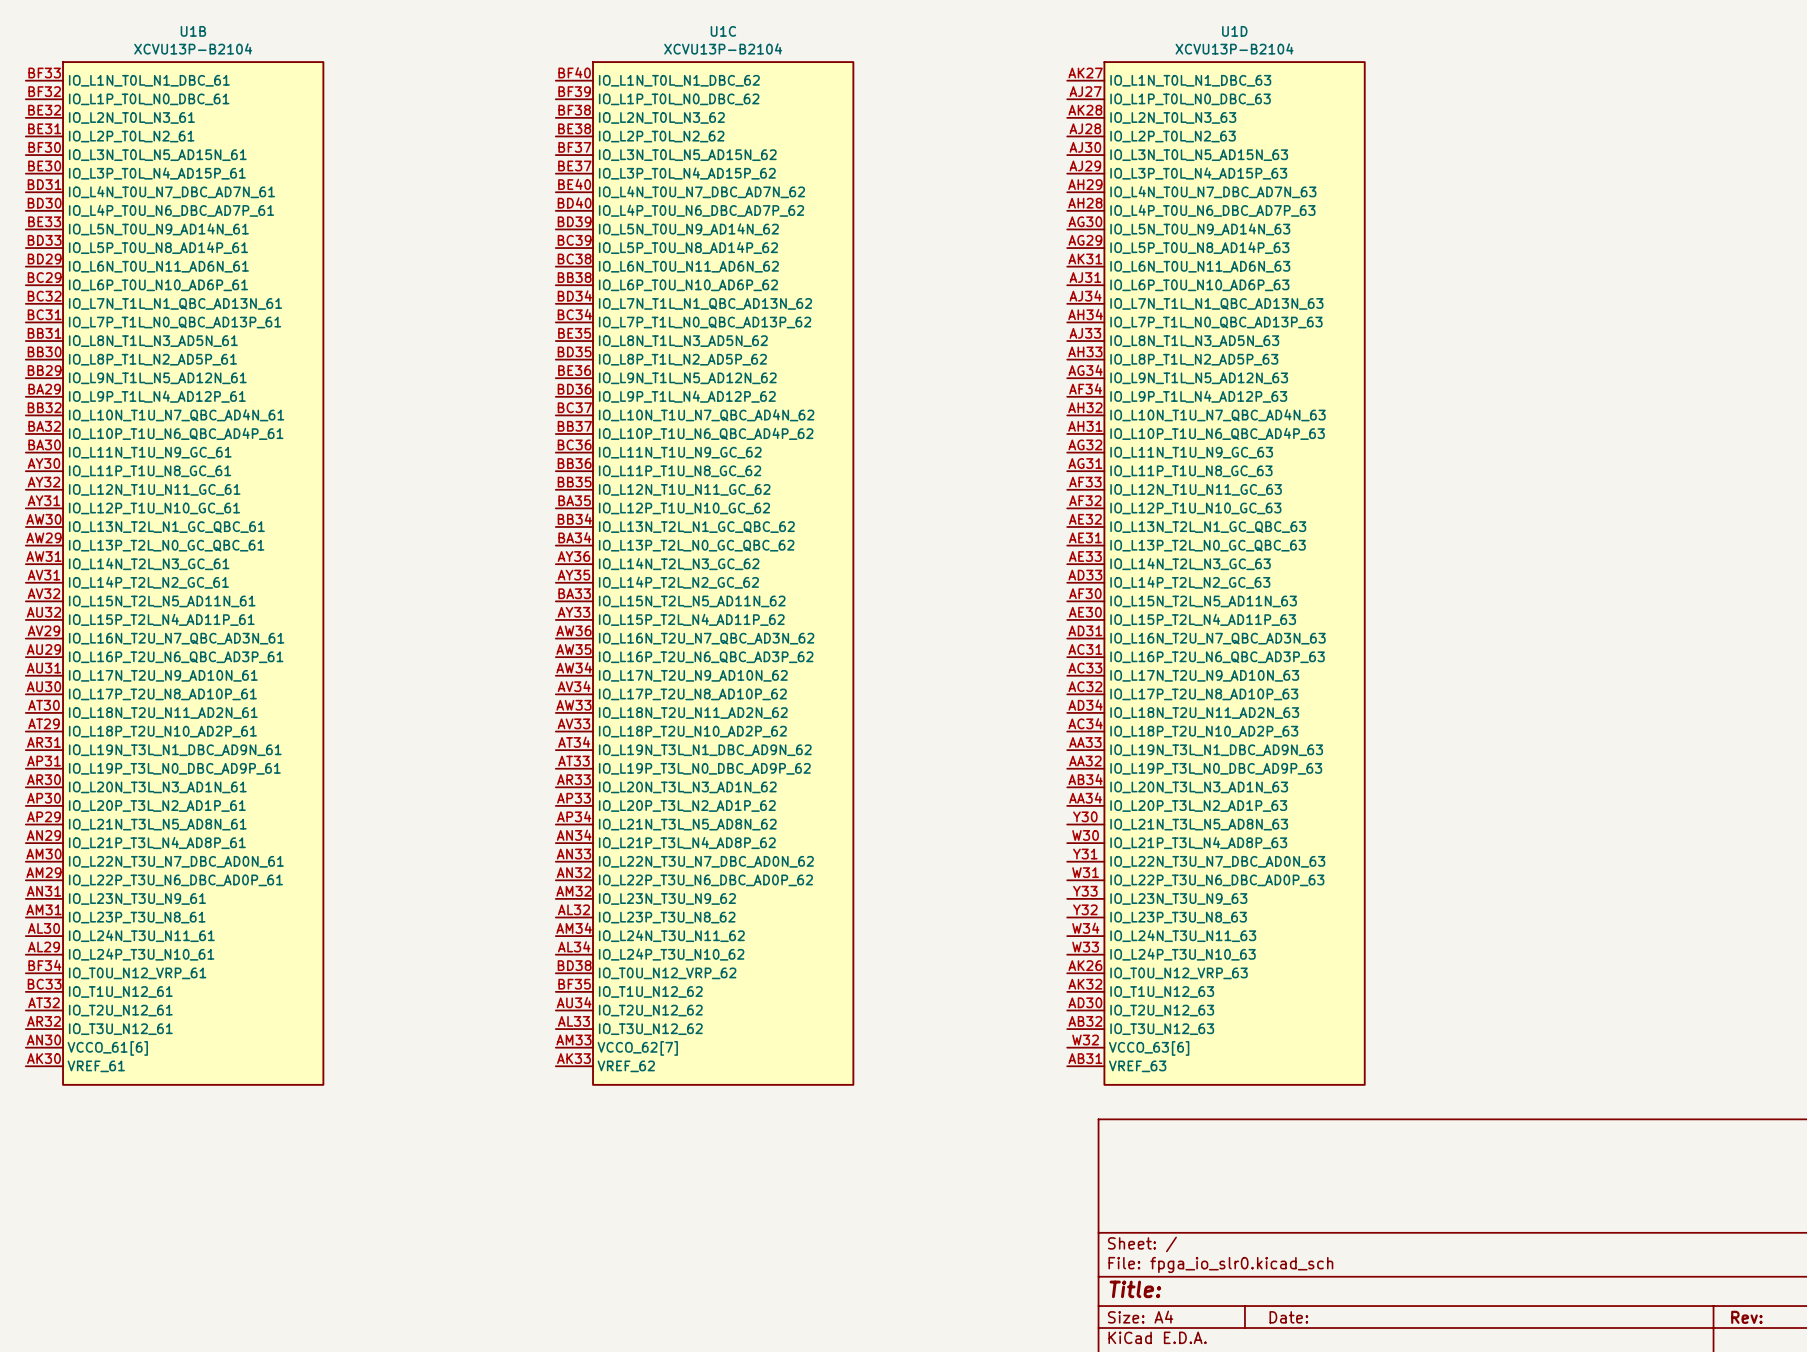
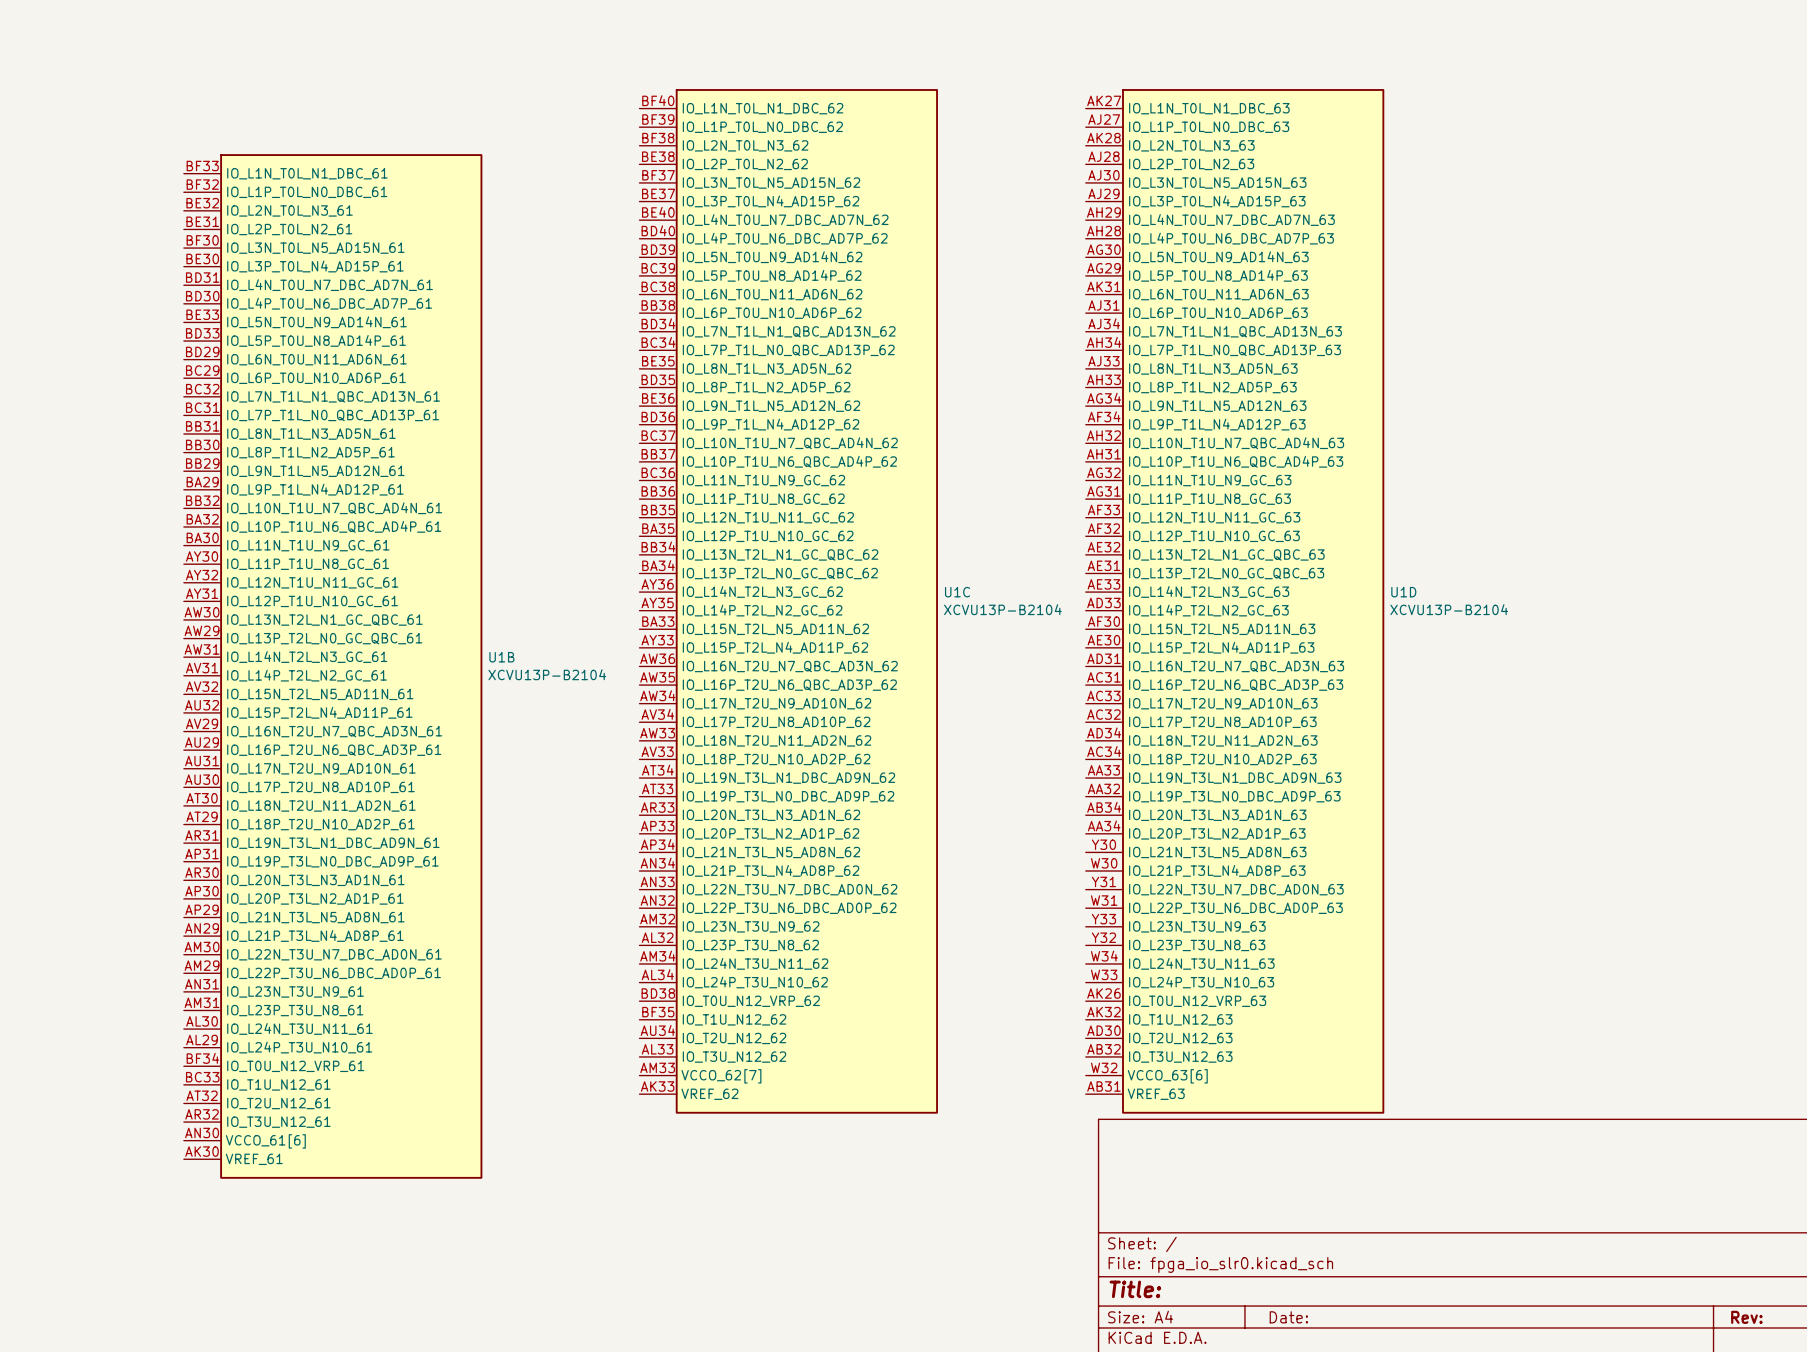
U1B name position: U1B (193, 31) -> U1B (501, 657)
U1C name position: U1C (723, 31) -> U1C (957, 592)
U1D name position: U1D (1234, 31) -> U1D (1403, 592)
U1B value position: XCVU13P-B2104 (193, 48) -> XCVU13P-B2104 (547, 674)
U1C value position: XCVU13P-B2104 (723, 48) -> XCVU13P-B2104 (1002, 609)
U1D value position: XCVU13P-B2104 (1234, 48) -> XCVU13P-B2104 (1449, 609)
U1B position: (175, 573) -> (333, 666)
U1C position: (705, 573) -> (788, 601)
U1D position: (1216, 573) -> (1235, 601)

